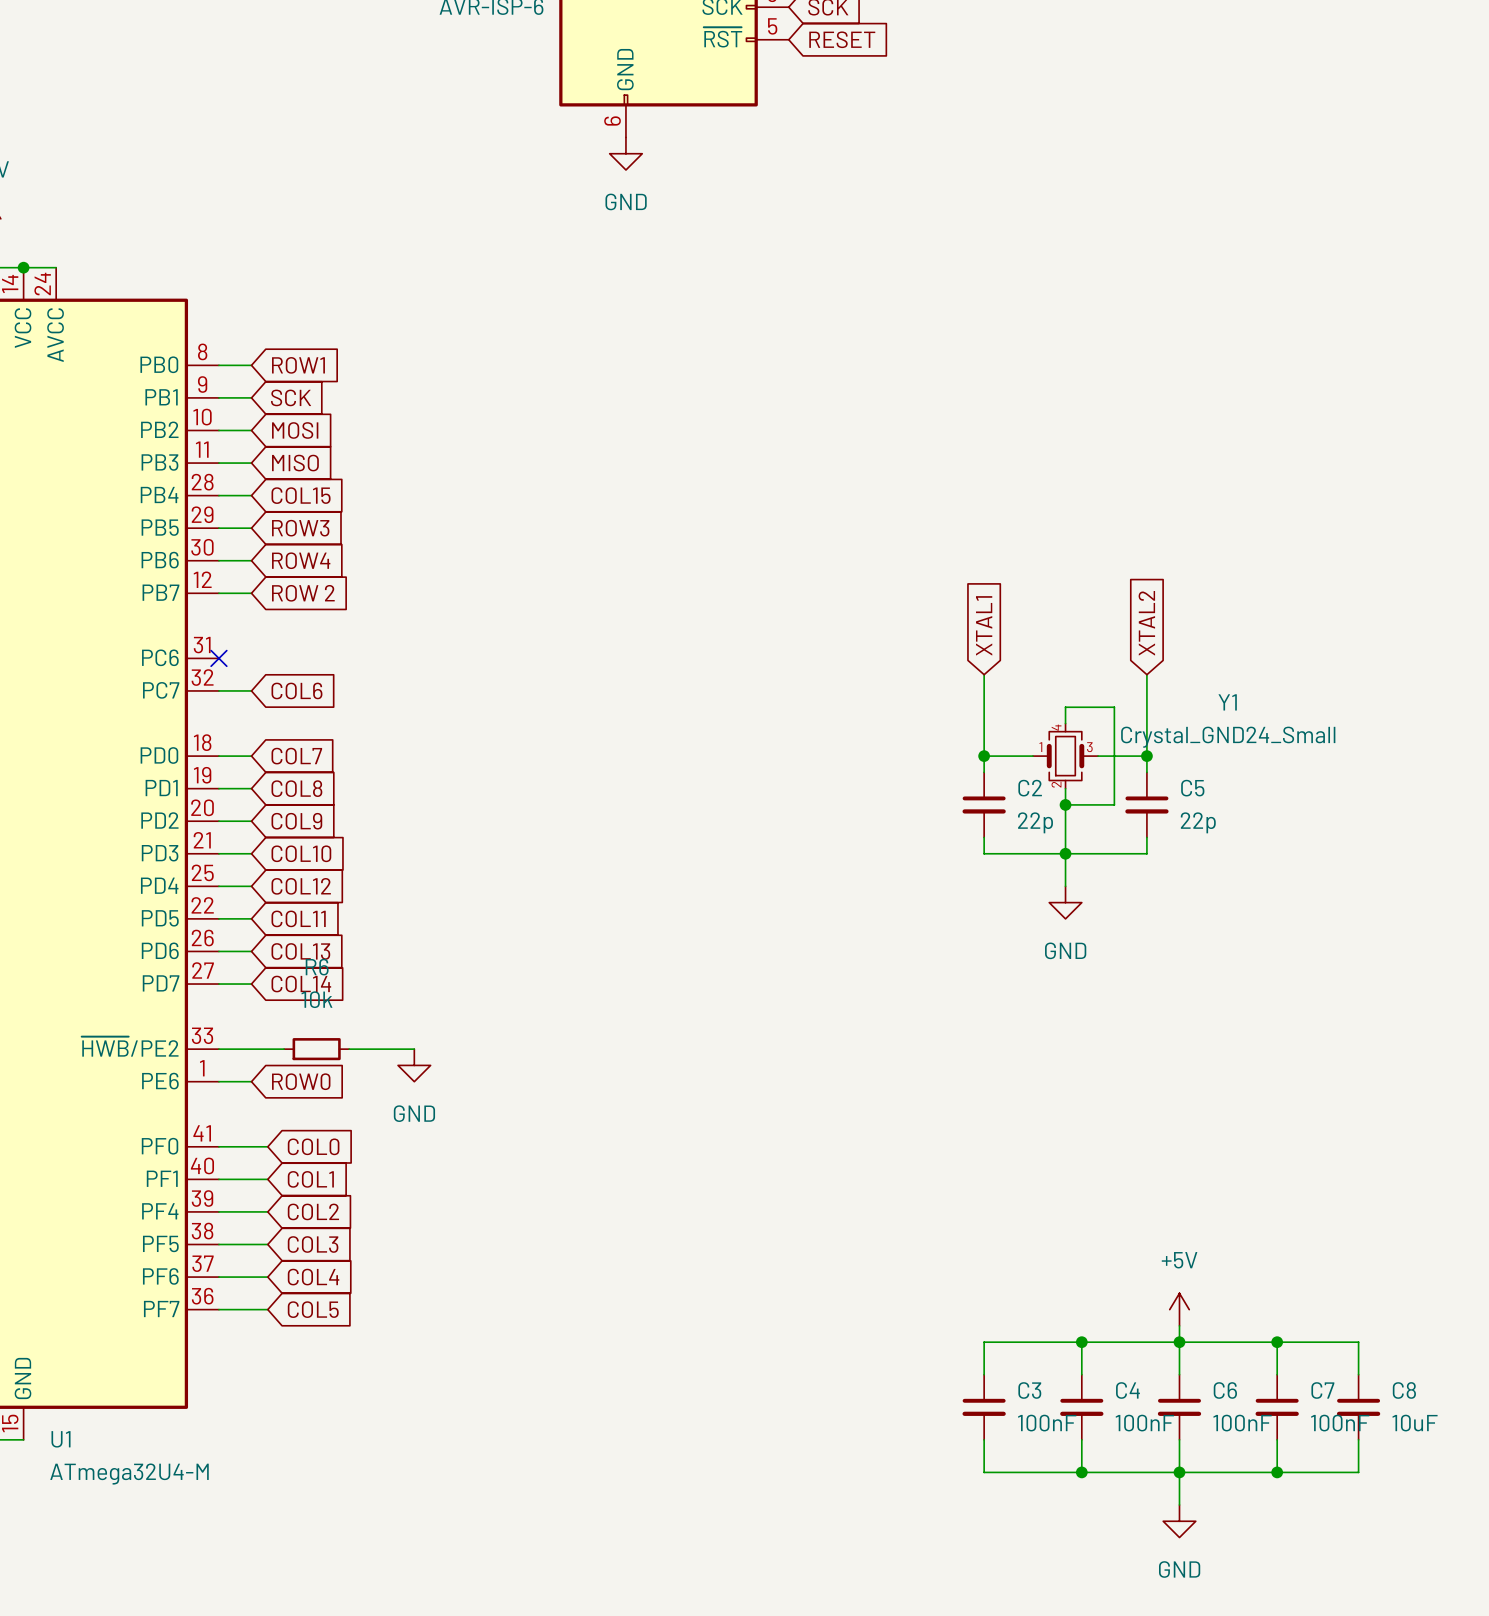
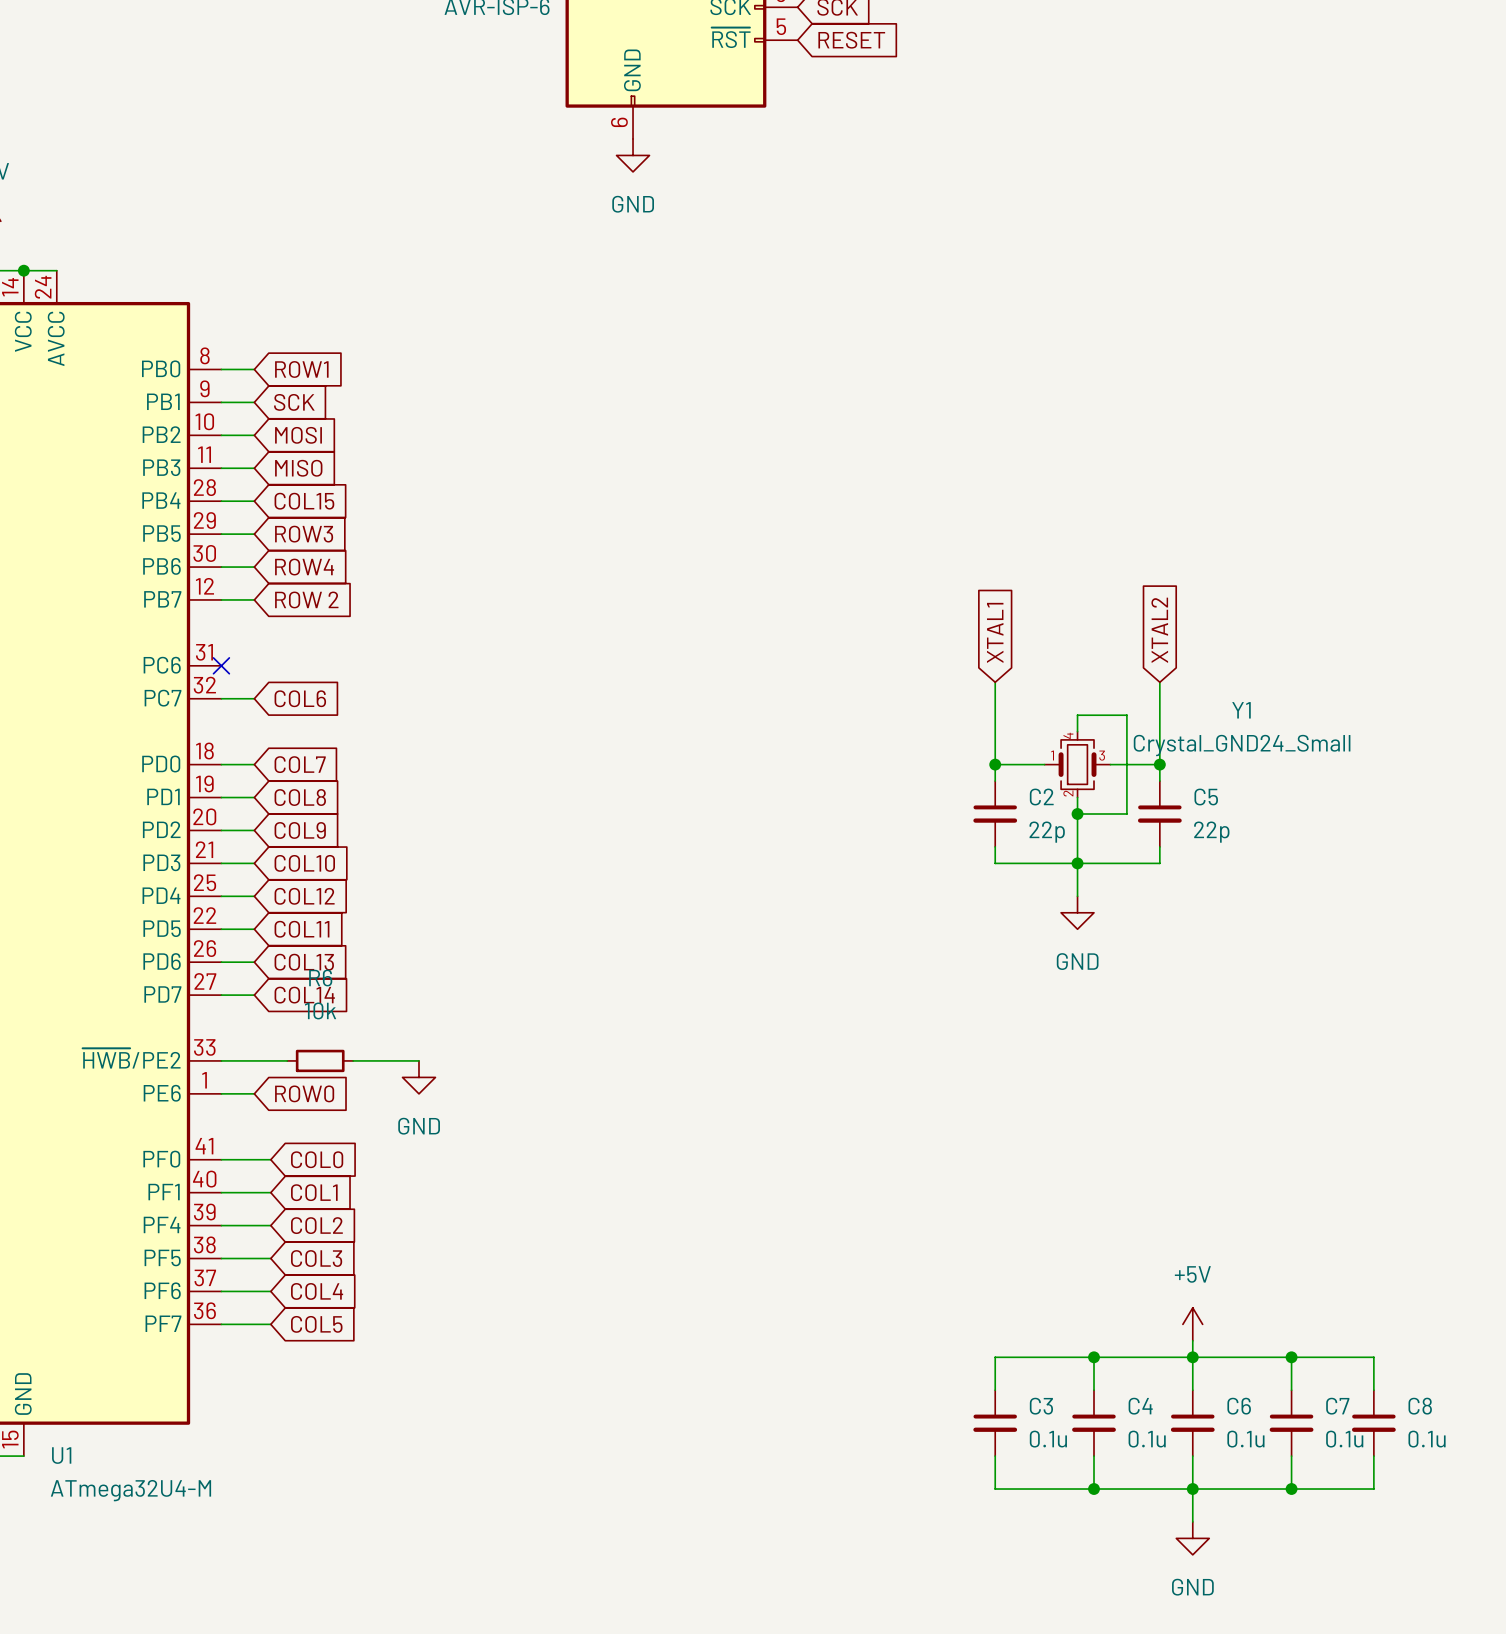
C3 value: 100nF (1047, 1423) -> 0.1u (1048, 1439)
C4 value: 100nF (1144, 1423) -> 0.1u (1147, 1439)
C6 value: 100nF (1242, 1423) -> 0.1u (1245, 1439)
C7 value: 100nF (1340, 1423) -> 0.1u (1344, 1439)
C8 value: 10uF (1415, 1423) -> 0.1u (1427, 1439)

